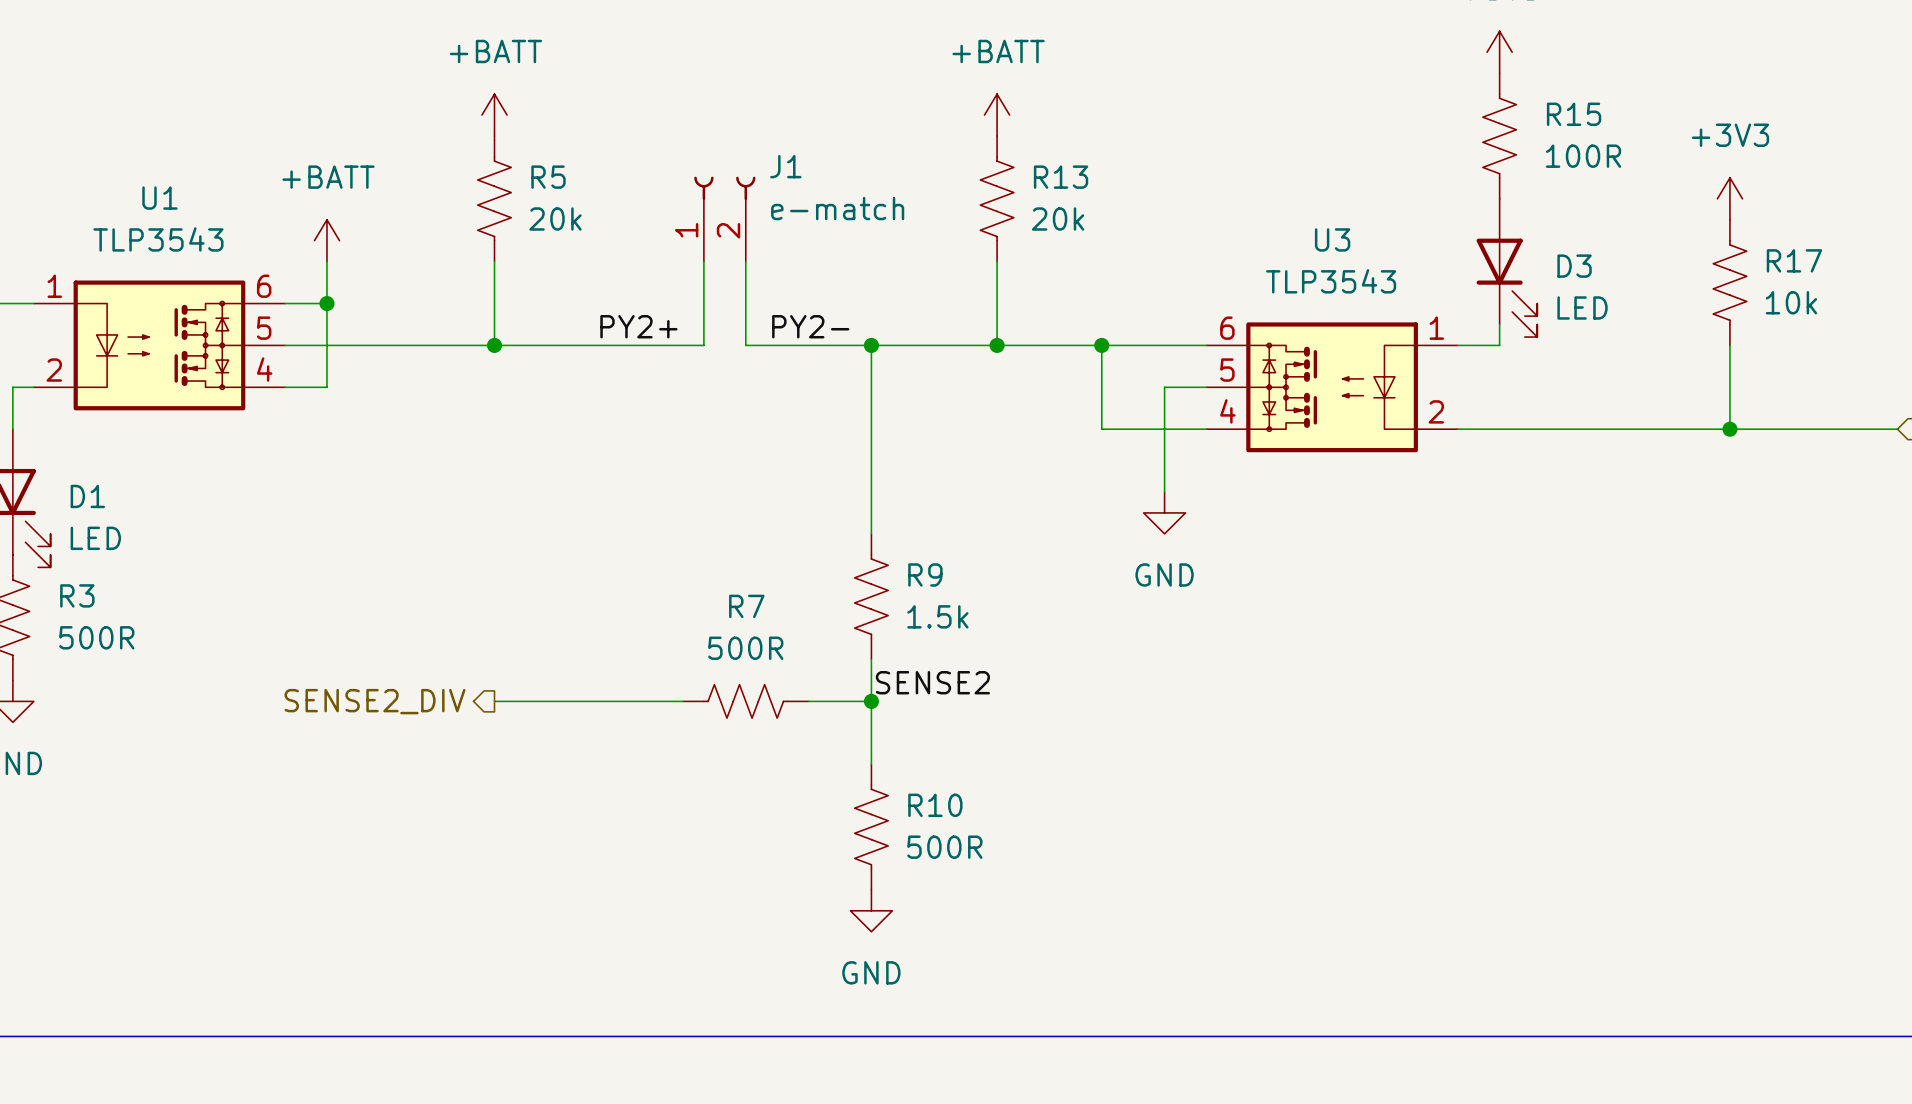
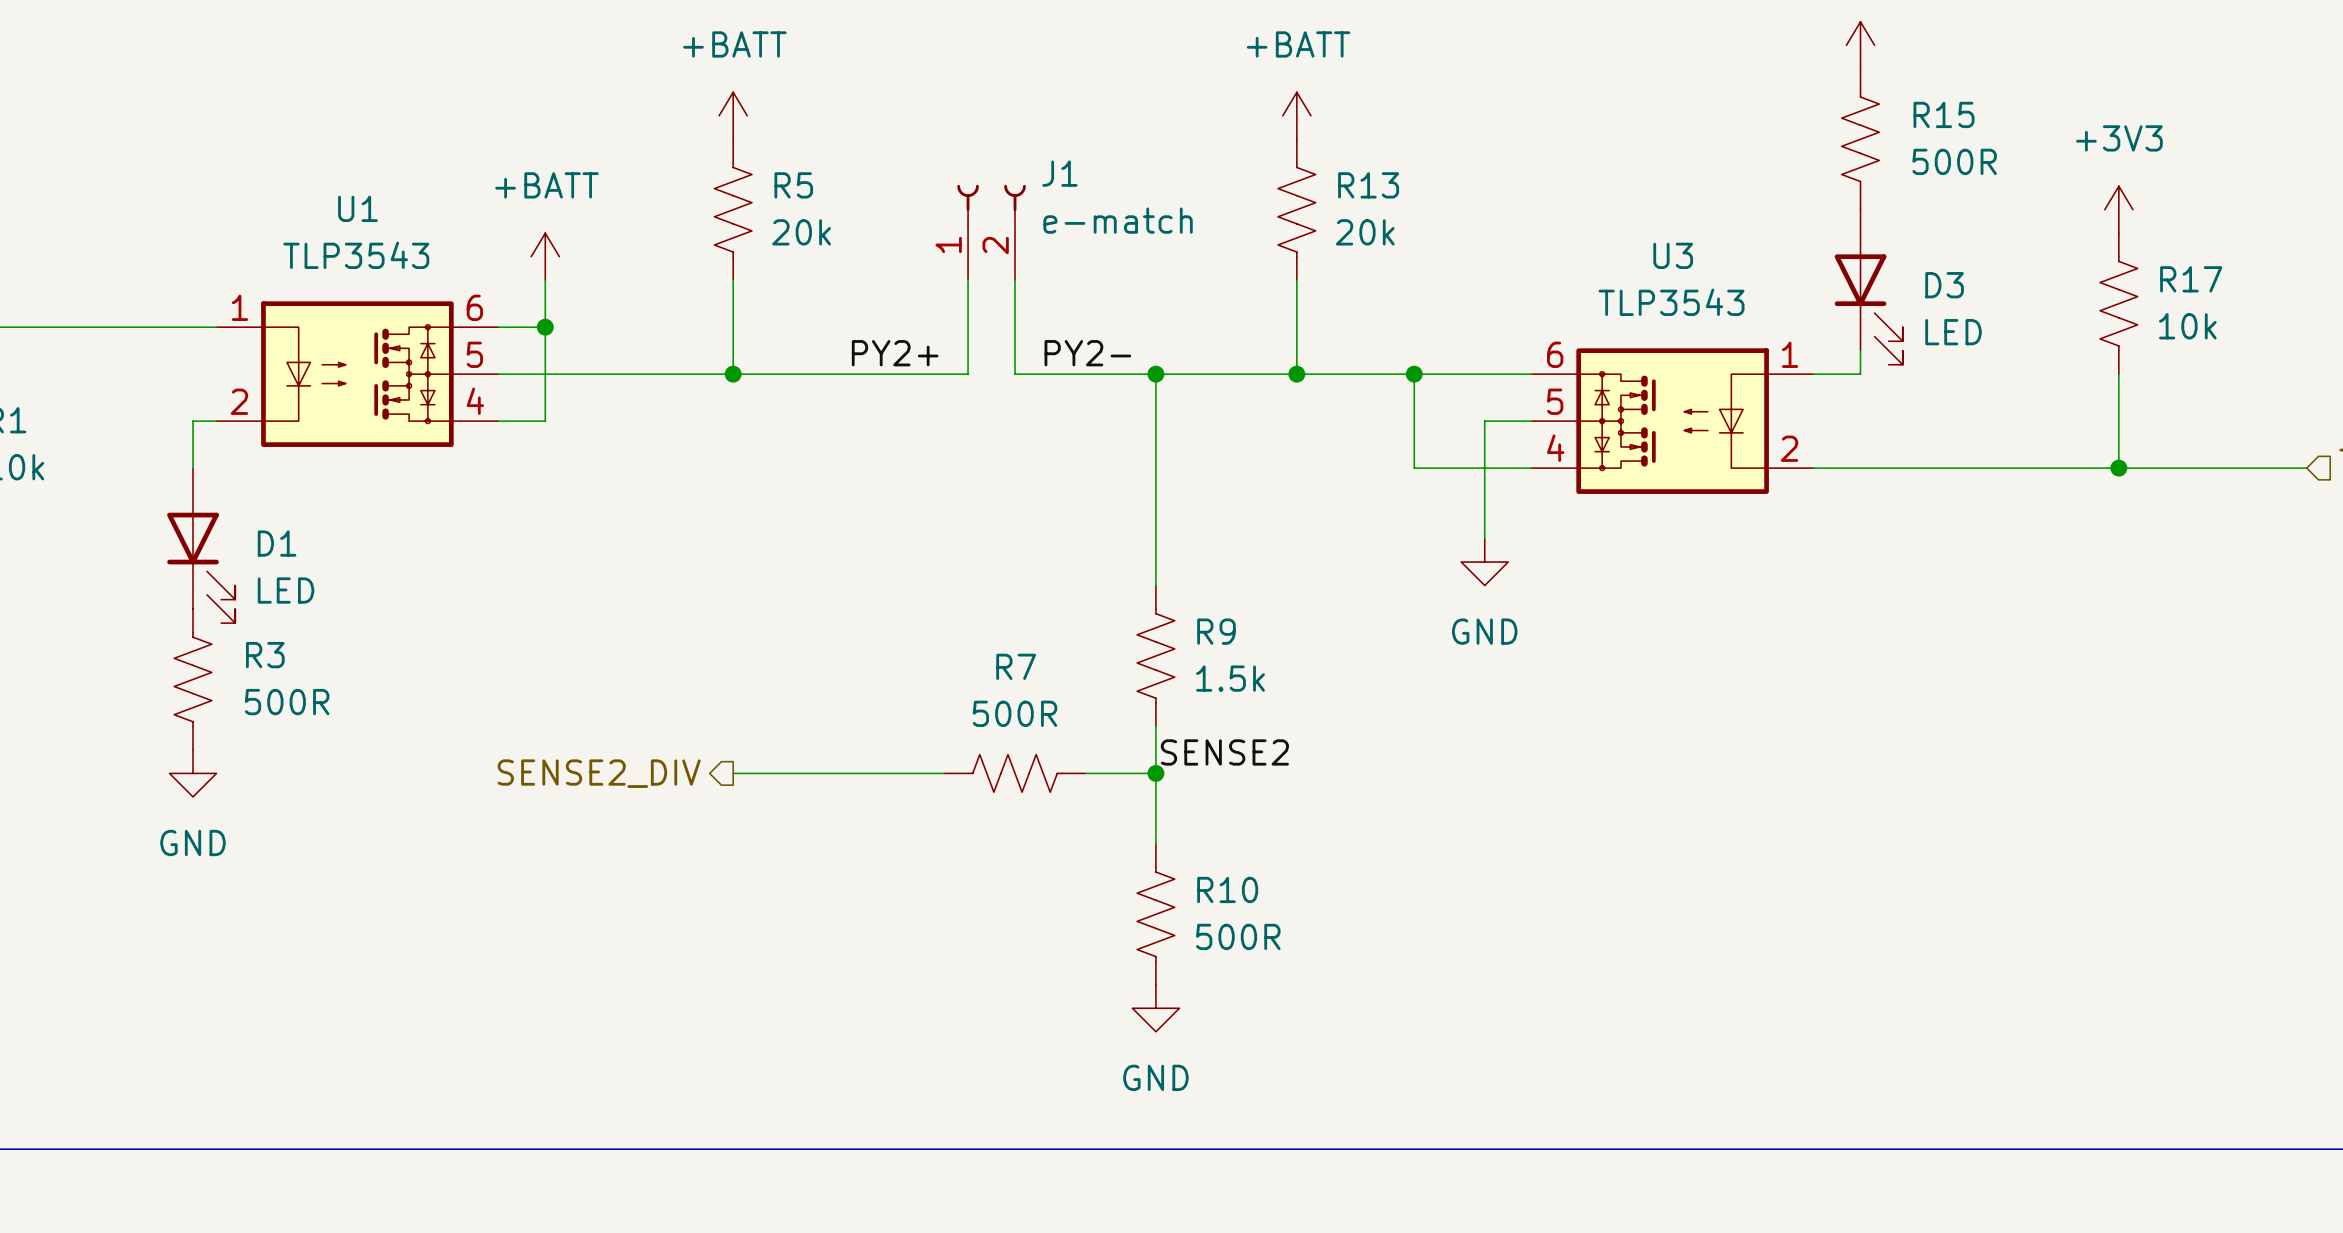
R15 value: 100R (1583, 156) -> 500R (1954, 161)

